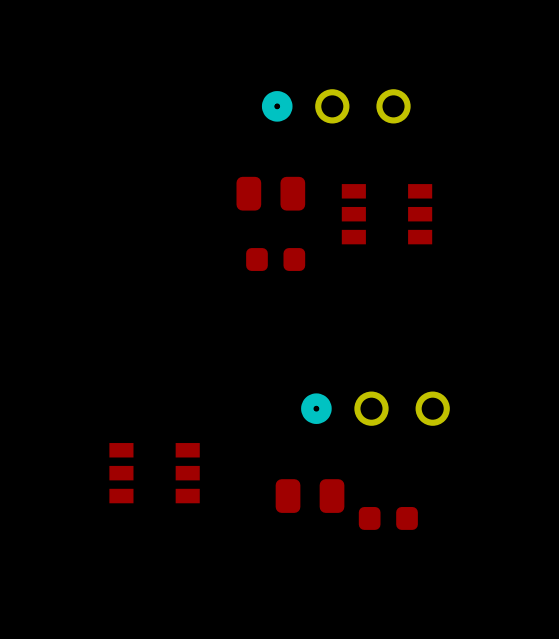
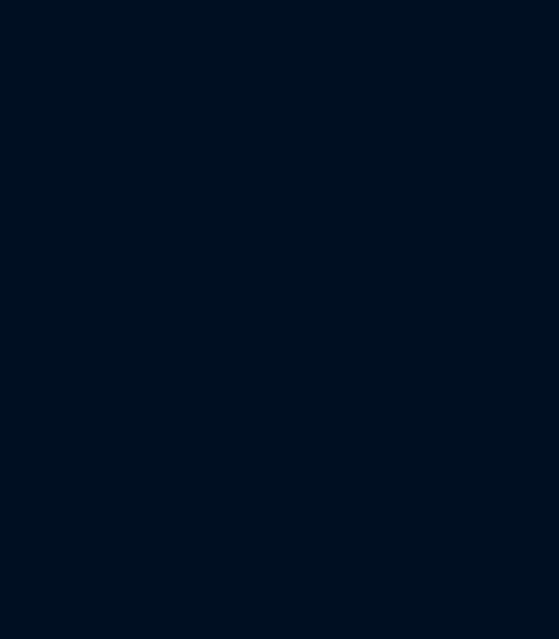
part: (336, 106) -> none
part: (270, 193) -> none
part: (386, 214) -> none
part: (275, 259) -> none
part: (375, 408) -> none
part: (154, 473) -> none
part: (310, 496) -> none
part: (388, 518) -> none

